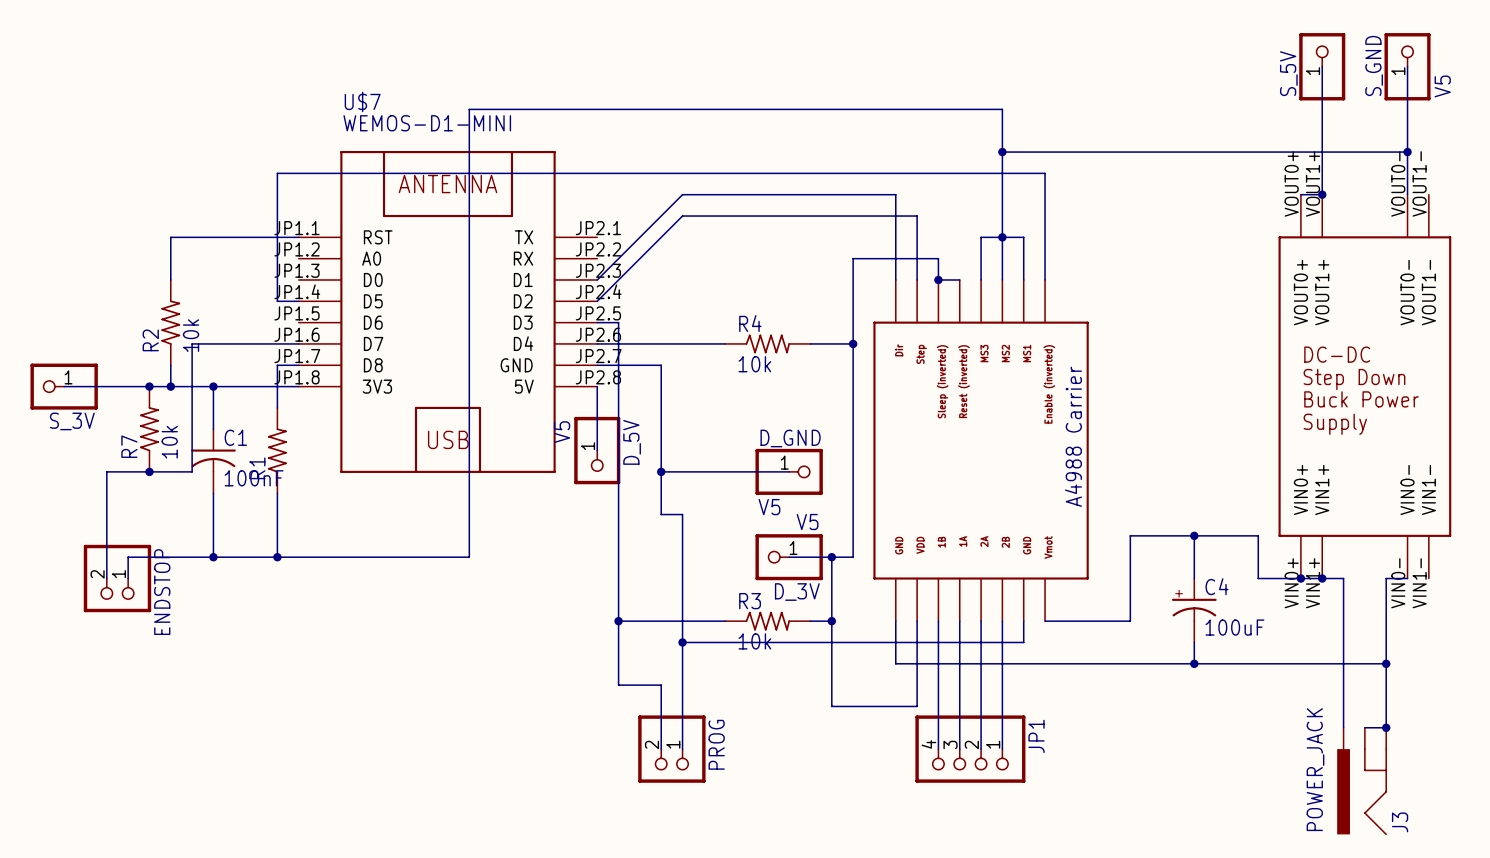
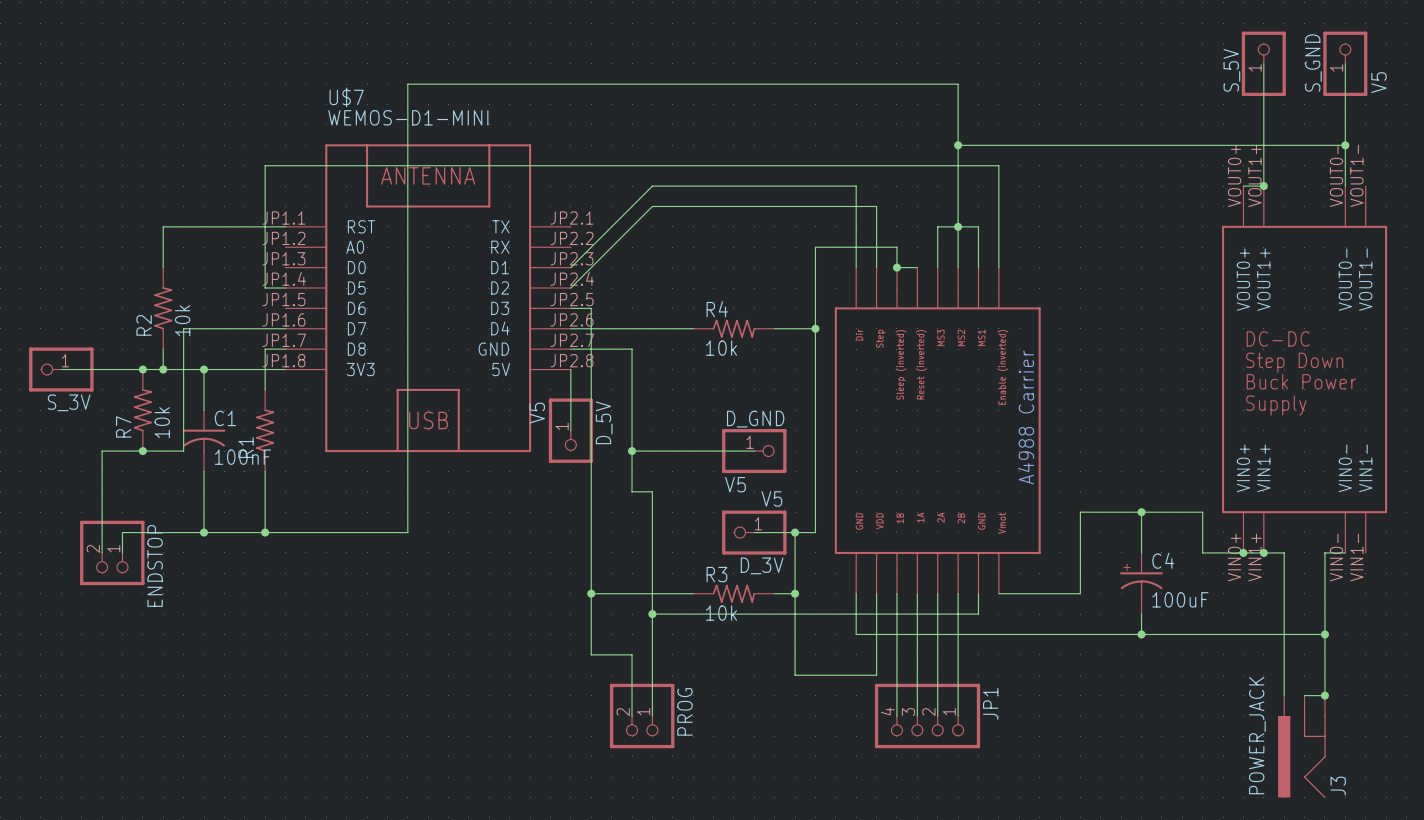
wire: (1002, 109) (469, 109) (469, 557) (426, 557) -> (958, 104) (958, 84) (407, 84) (407, 532)

